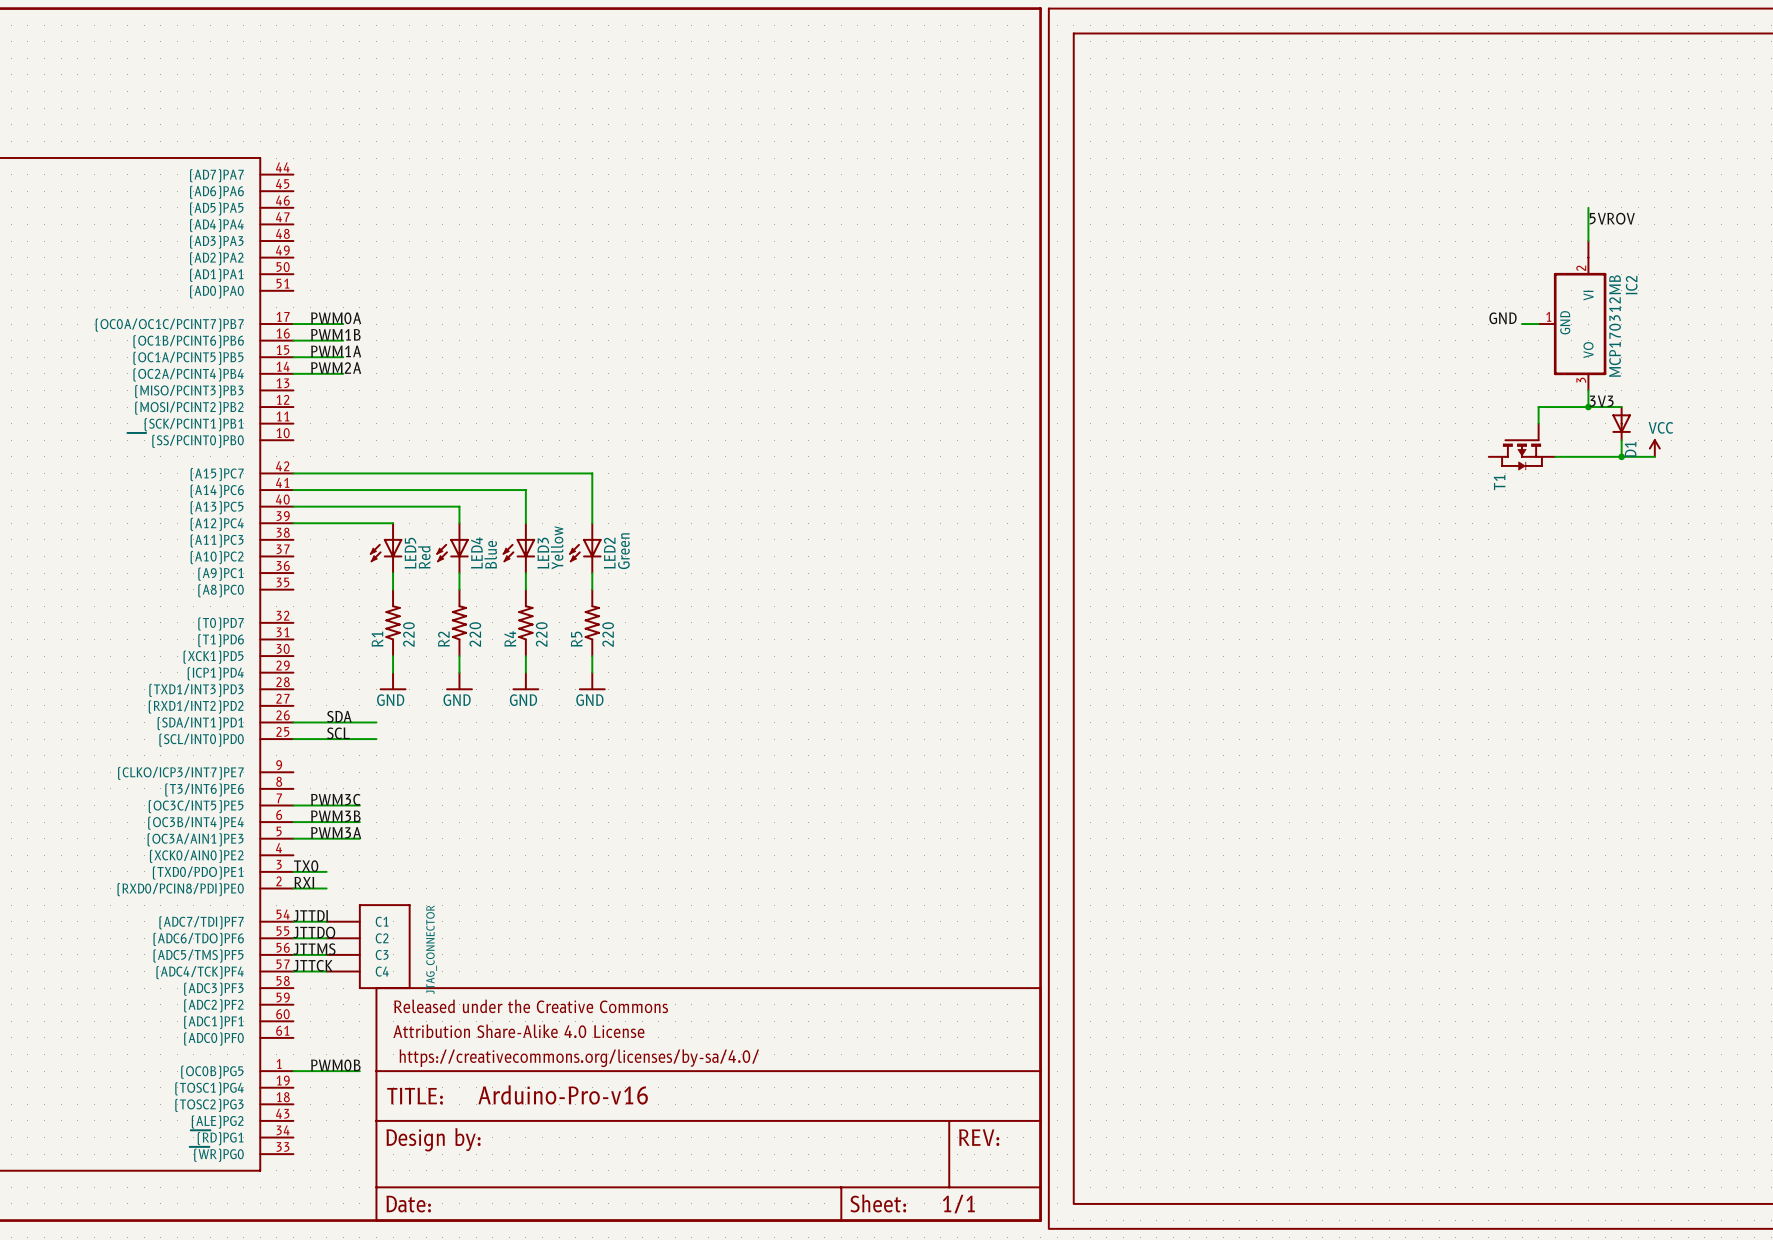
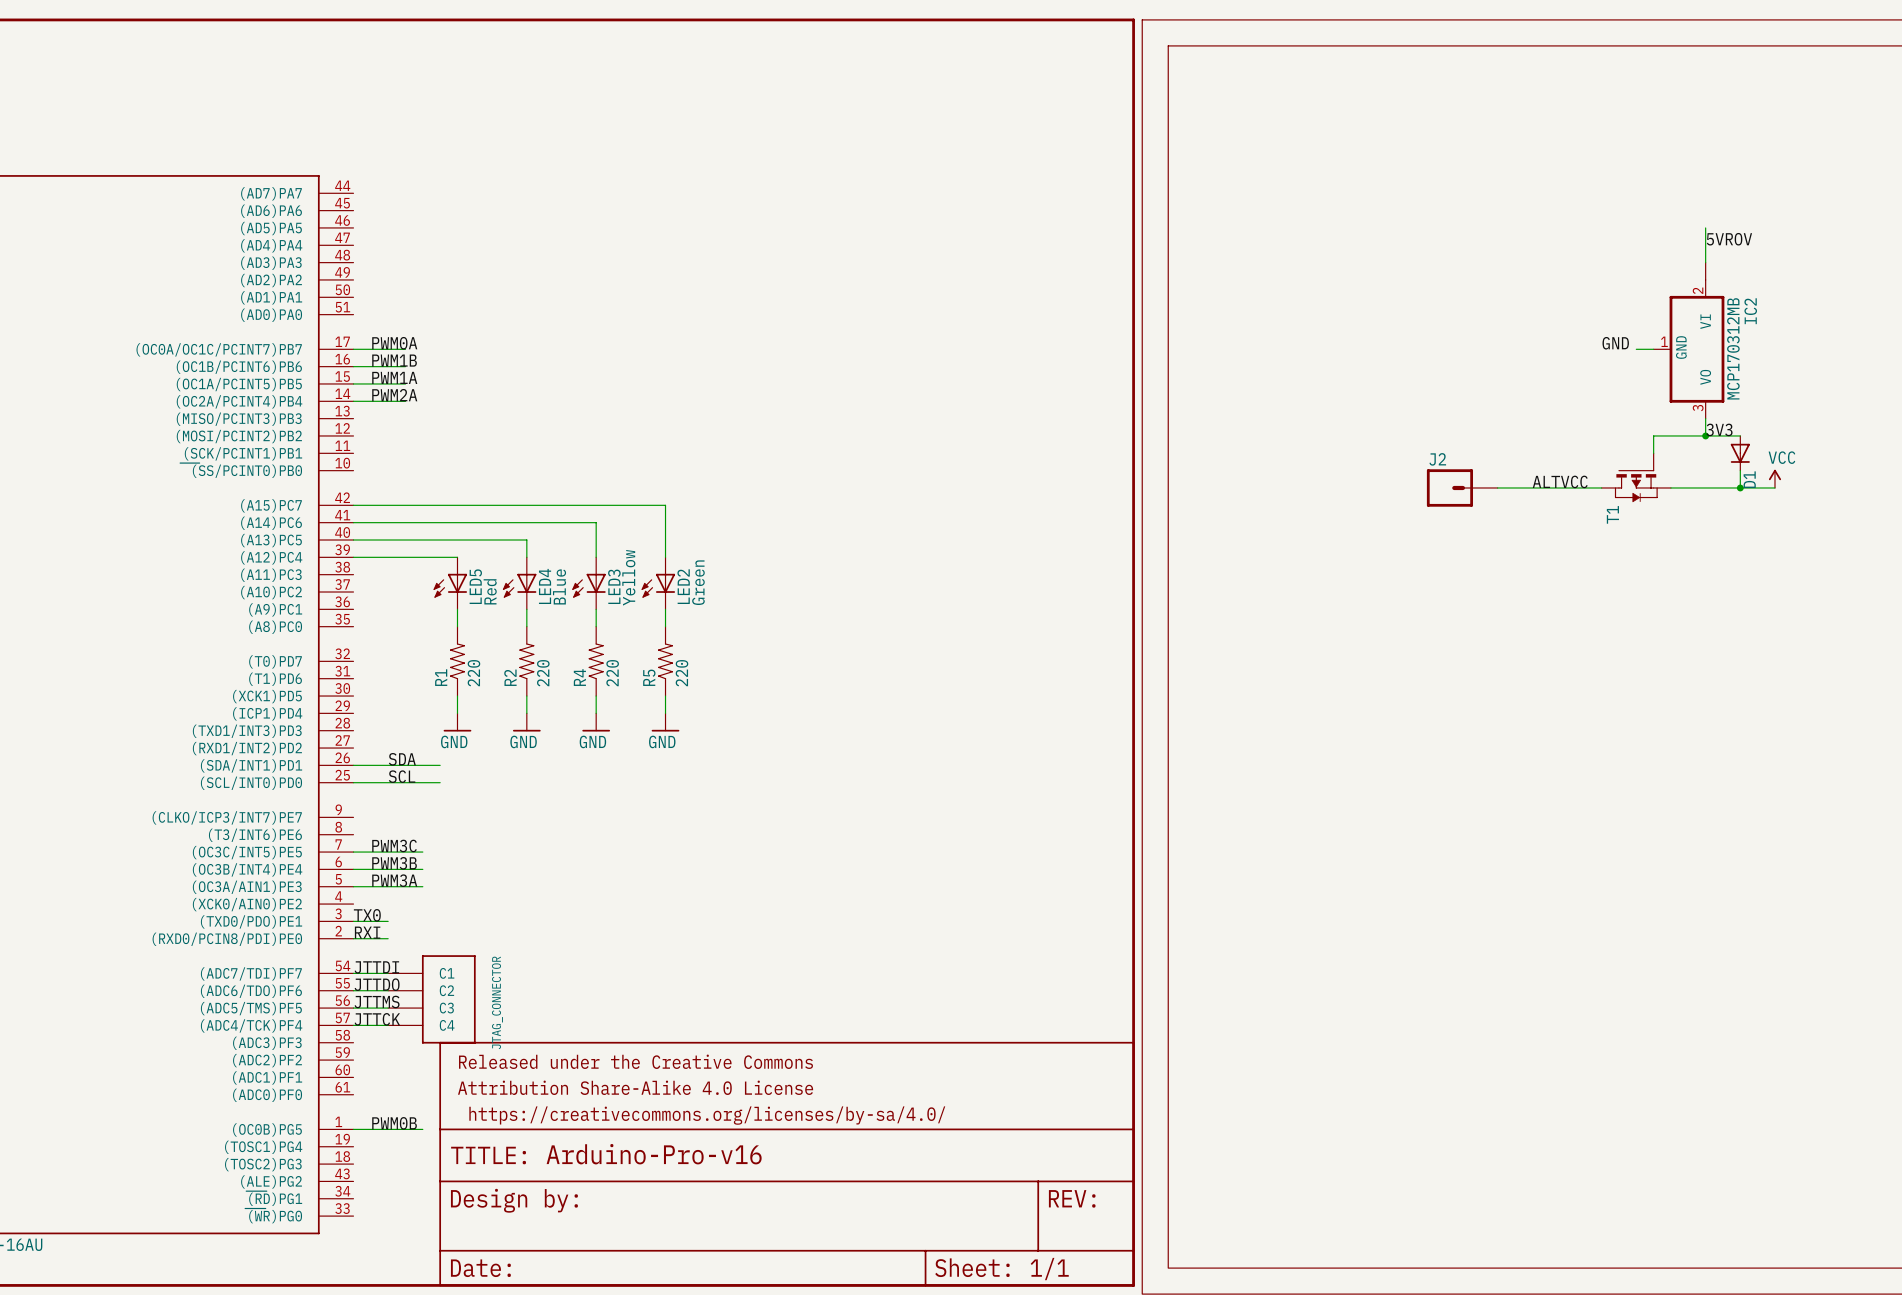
label: none -> ALTVCC (1560, 481)
J2: none -> (1462, 487)
wire: none -> (1497, 487) (1601, 487)

